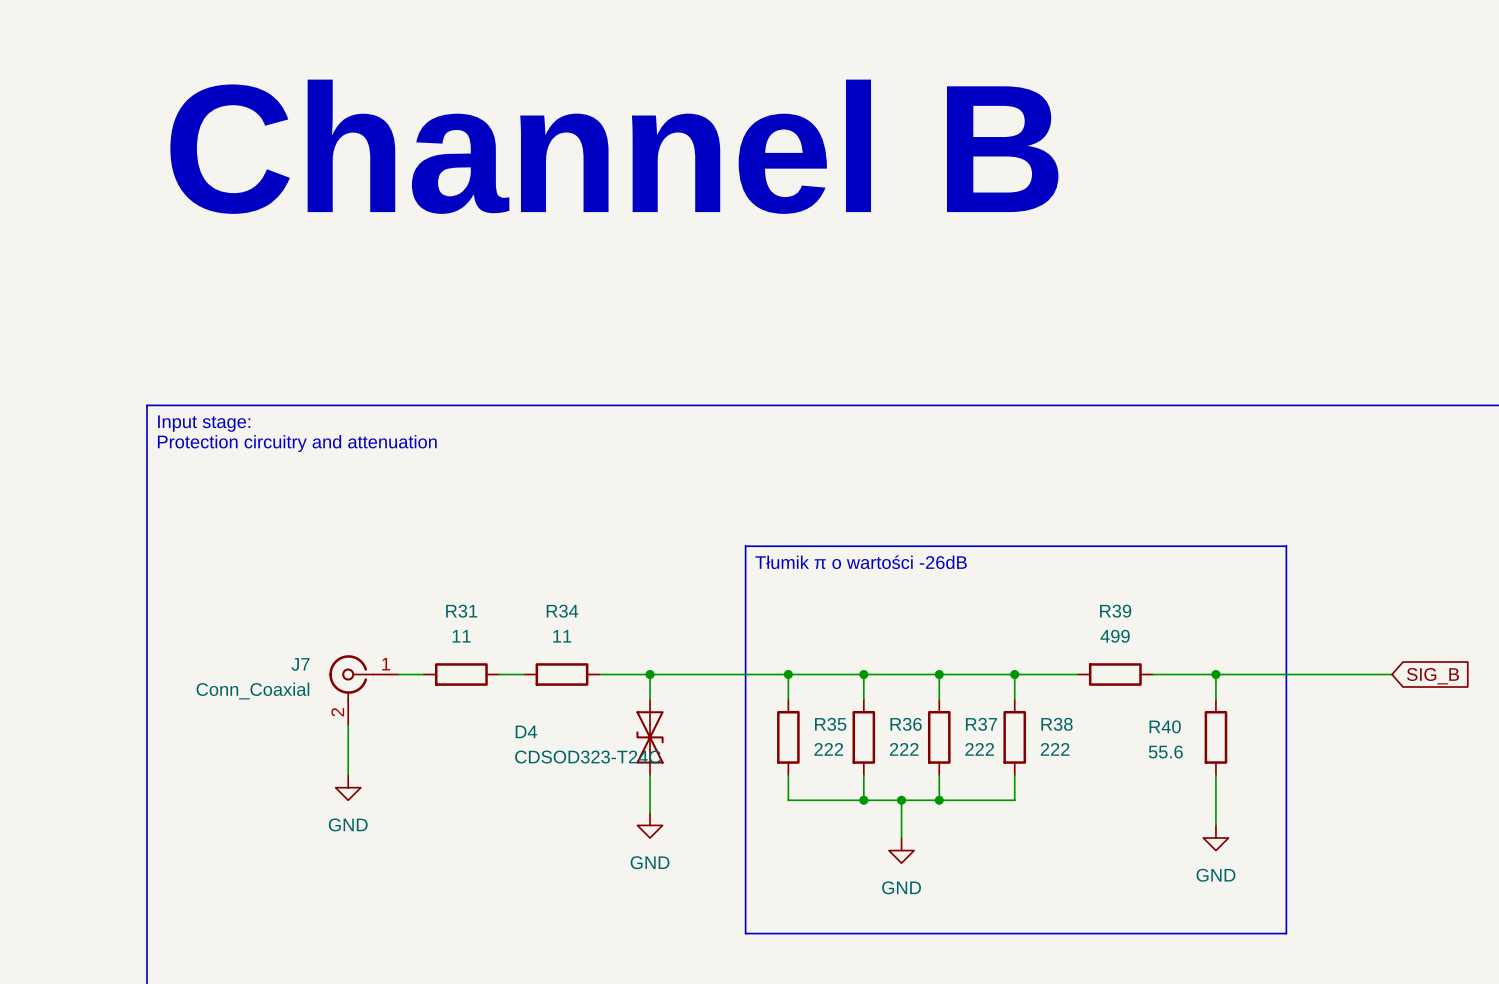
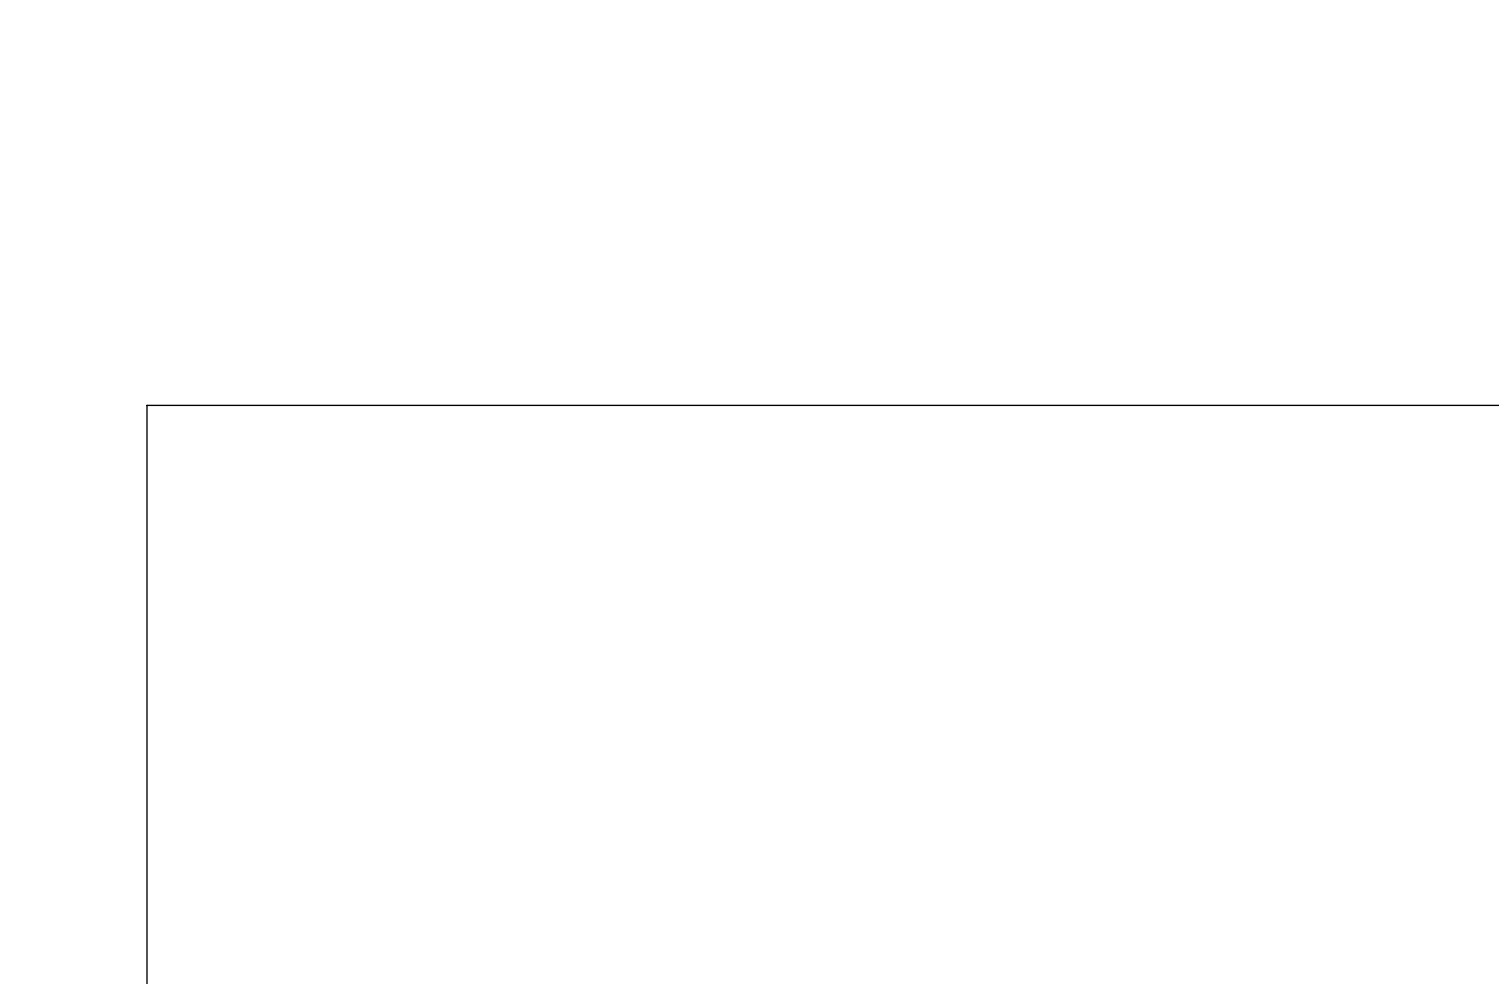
text: Channel B (614, 146) -> none
text: Input stage: (204, 423) -> none
text: Protection circuitry and attenuation (297, 443) -> none
line: (745, 546) (1286, 546) (1286, 933) (745, 933) (745, 546) -> none
text: Tłumik π o wartości -26dB (861, 562) -> none
wire: (398, 674) (423, 674) -> none
R31: 11 (461, 674) -> none
wire: (499, 674) (524, 674) -> none
R34: 11 (562, 674) -> none
wire: (599, 674) (1077, 674) -> none
wire: (650, 674) (650, 699) -> none
junction: (650, 674) -> none
wire: (788, 674) (788, 699) -> none
junction: (788, 674) -> none
wire: (863, 674) (863, 699) -> none
junction: (863, 674) -> none
wire: (939, 674) (939, 699) -> none
junction: (939, 674) -> none
wire: (1014, 674) (1014, 699) -> none
junction: (1014, 674) -> none
R39: 499 (1115, 674) -> none
wire: (1153, 674) (1392, 674) -> none
wire: (1215, 674) (1215, 699) -> none
junction: (1215, 674) -> none
global label: SIG_B (1433, 676) -> none
J7: Conn_Coaxial (363, 689) -> none
wire: (348, 724) (348, 775) -> none
D4: CDSOD323-T24C (650, 737) -> none
R35: 222 (788, 737) -> none
R36: 222 (863, 737) -> none
R37: 222 (939, 737) -> none
R38: 222 (1014, 737) -> none
R40: 55.6 (1215, 737) -> none
wire: (650, 775) (650, 812) -> none
wire: (788, 775) (788, 800) (1014, 800) (1014, 775) -> none
wire: (863, 775) (863, 800) -> none
wire: (939, 775) (939, 800) -> none
wire: (1215, 775) (1215, 825) -> none
power symbol: GND (348, 787) -> none
junction: (863, 800) -> none
wire: (901, 800) (901, 838) -> none
junction: (901, 800) -> none
junction: (939, 800) -> none
power symbol: GND (650, 825) -> none
power symbol: GND (1215, 838) -> none
power symbol: GND (901, 850) -> none

